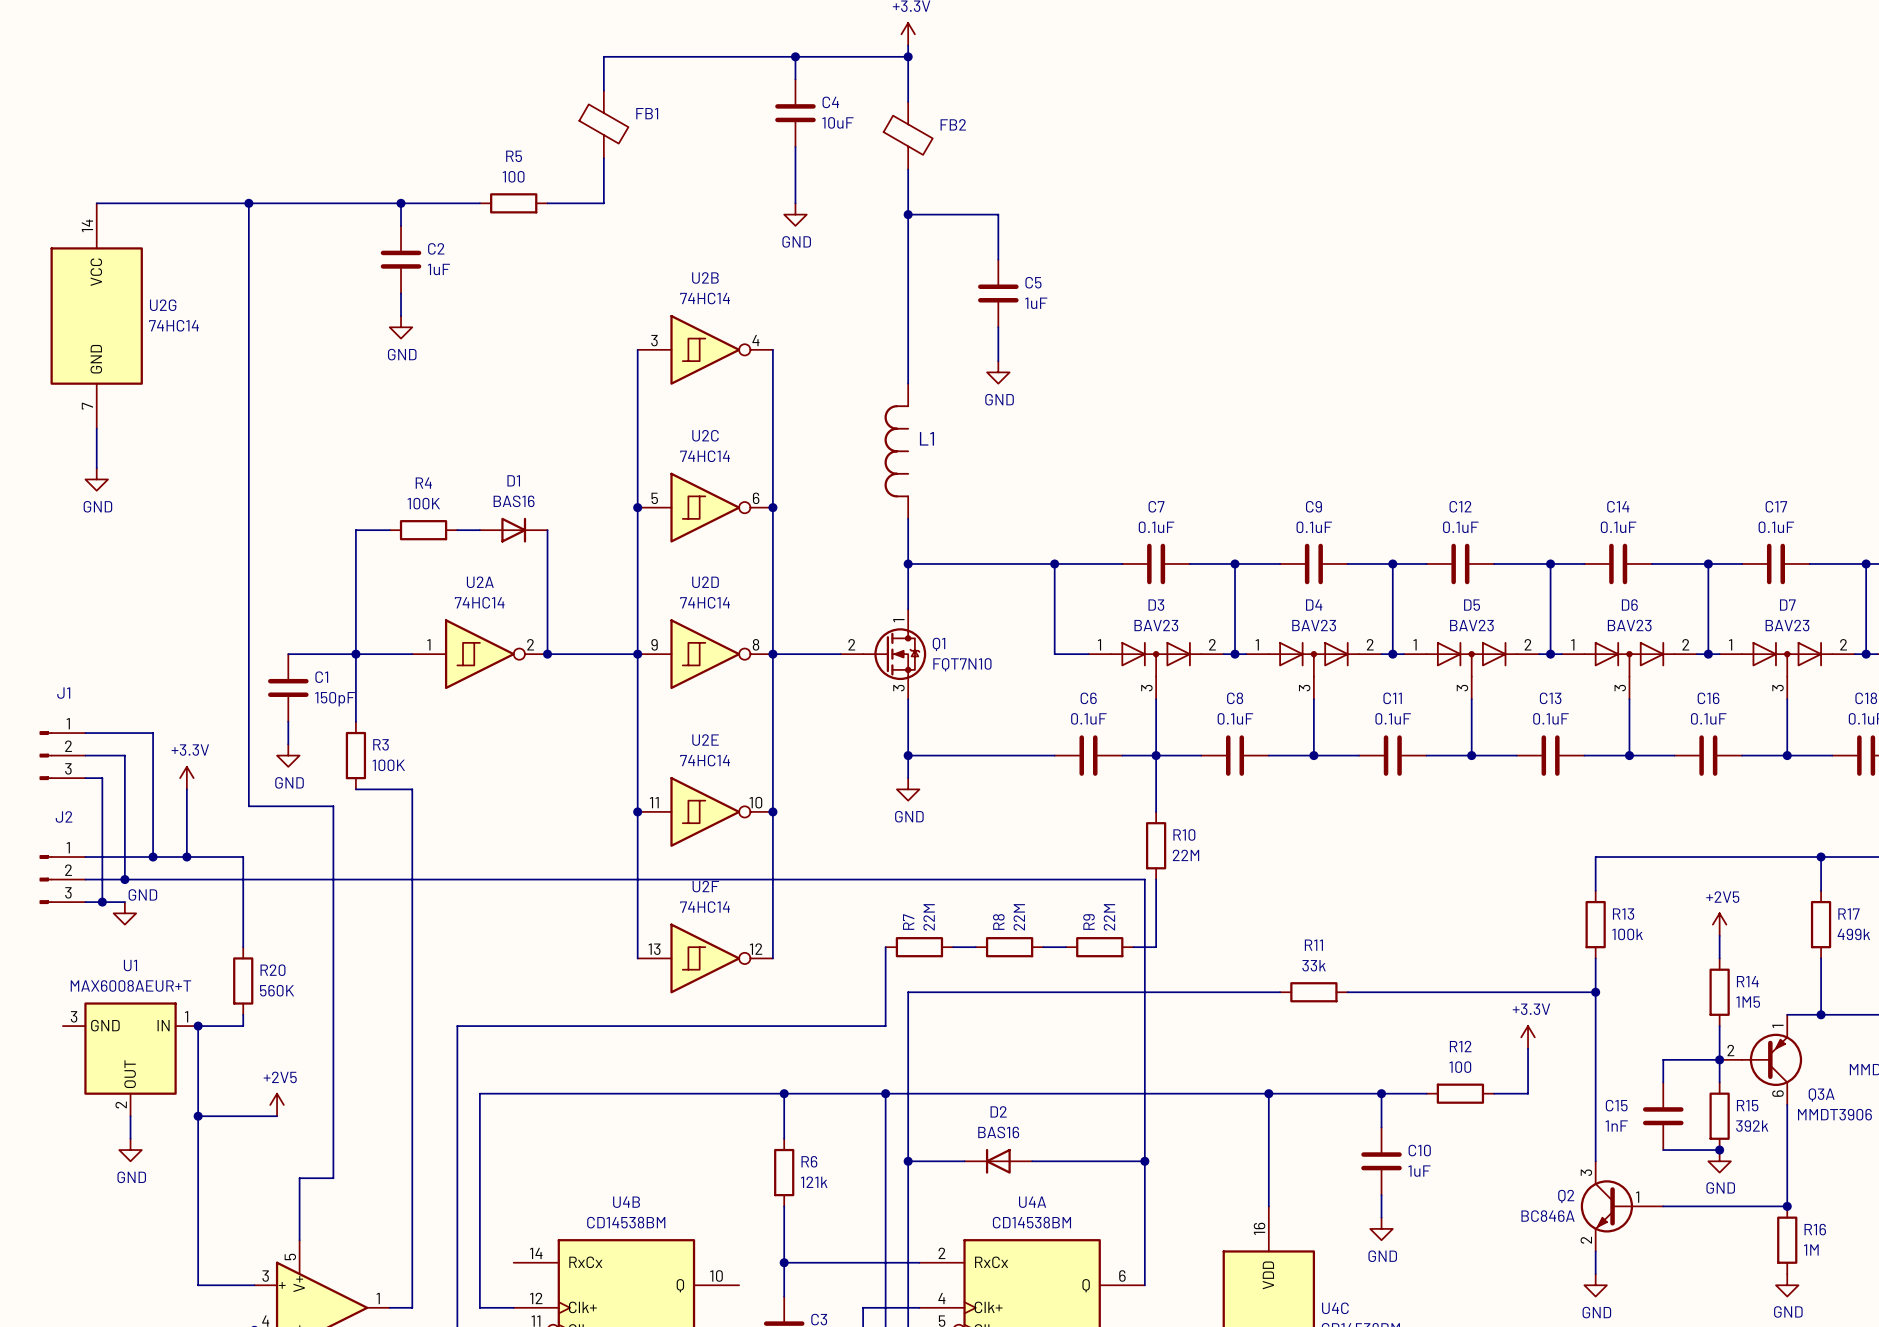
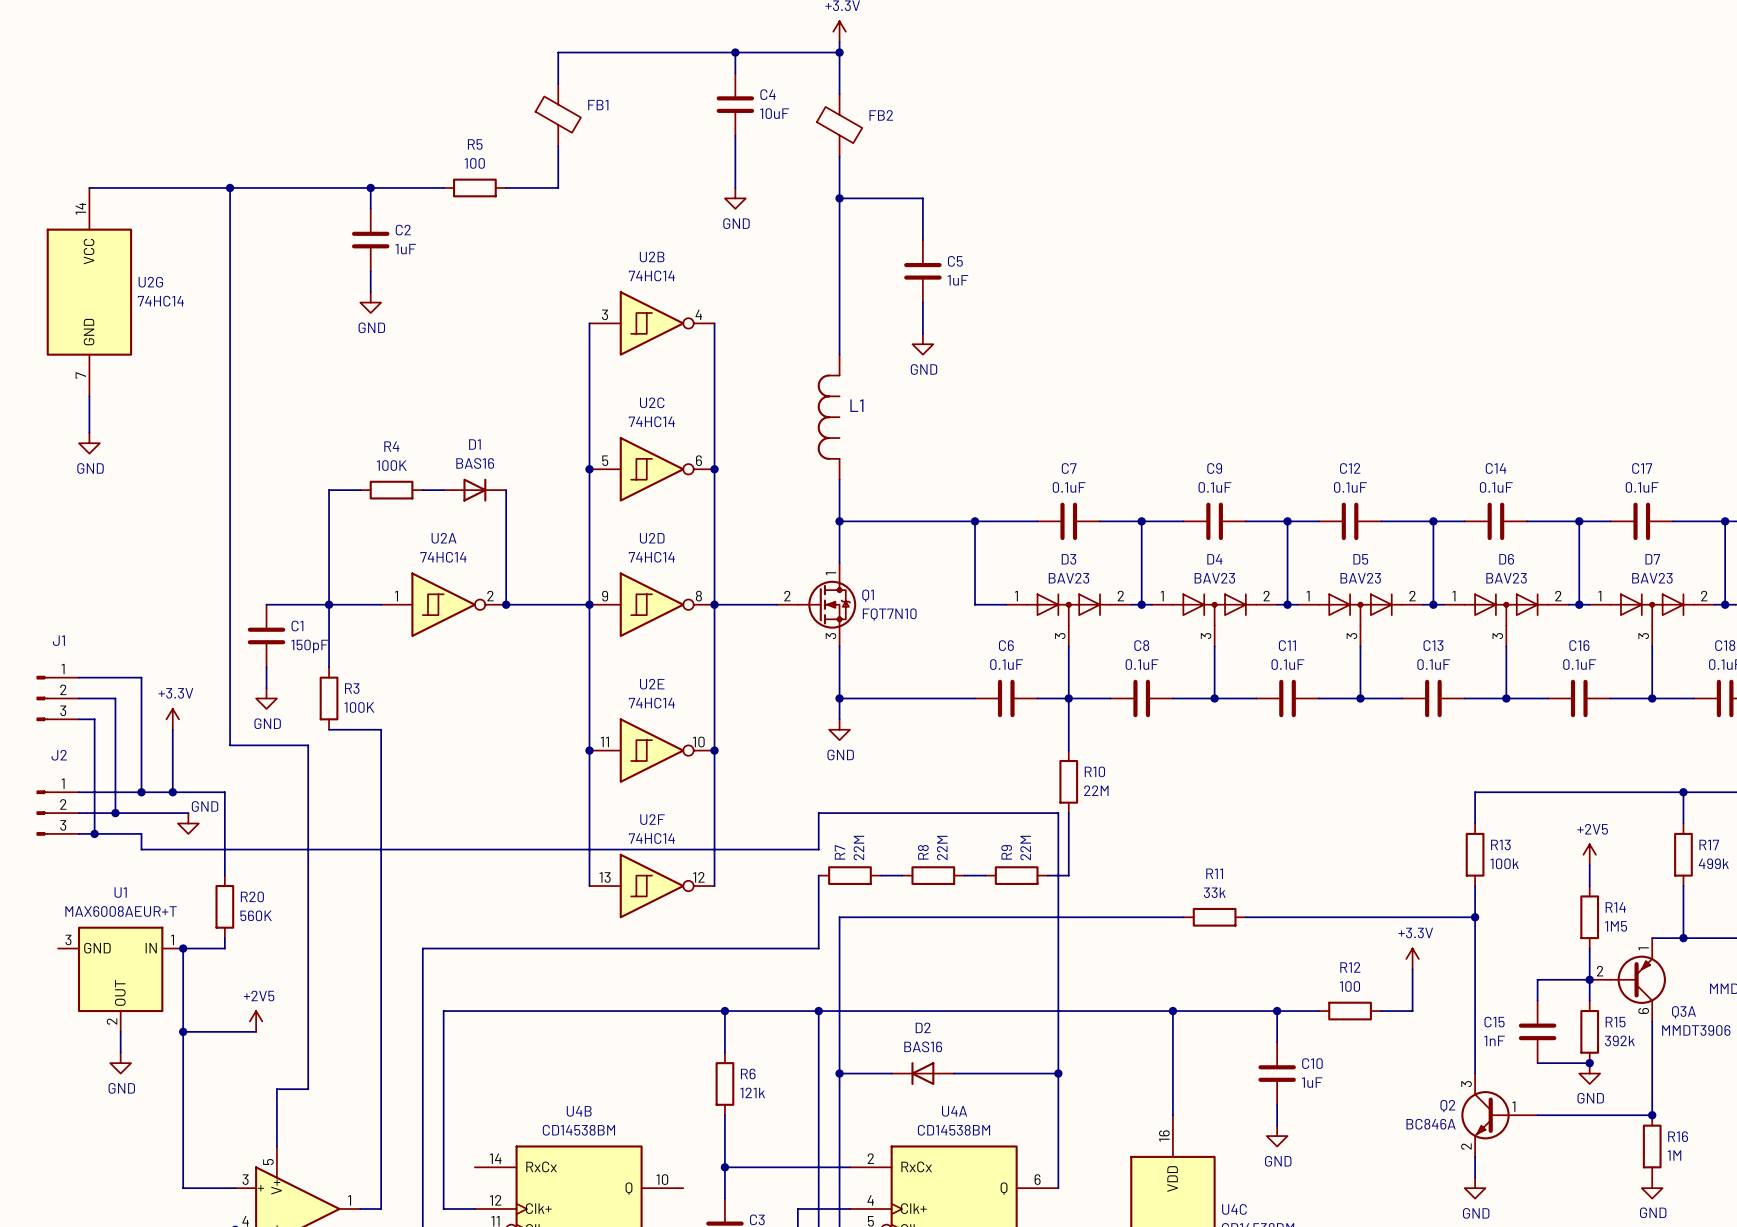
wire: (203, 879) (885, 879) -> (115, 833) (141, 833) (141, 849) (818, 849) (818, 813)
power symbol position: GND (124, 913) -> GND (188, 823)

